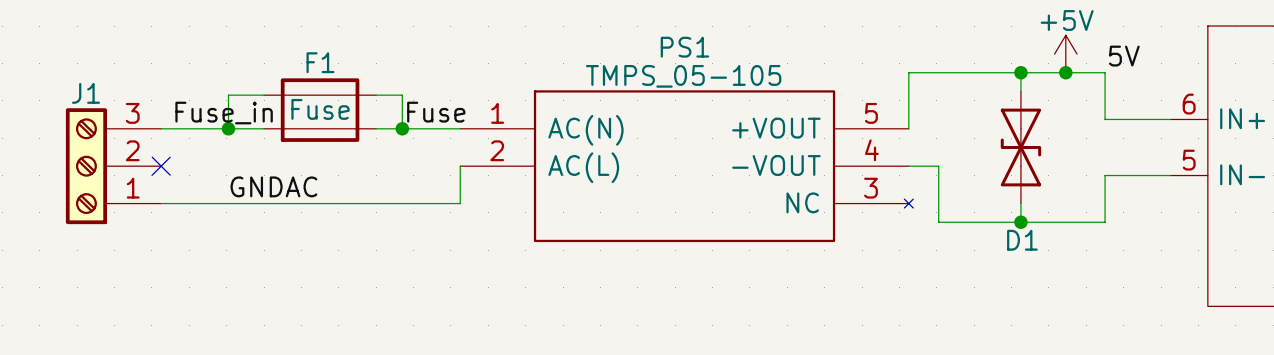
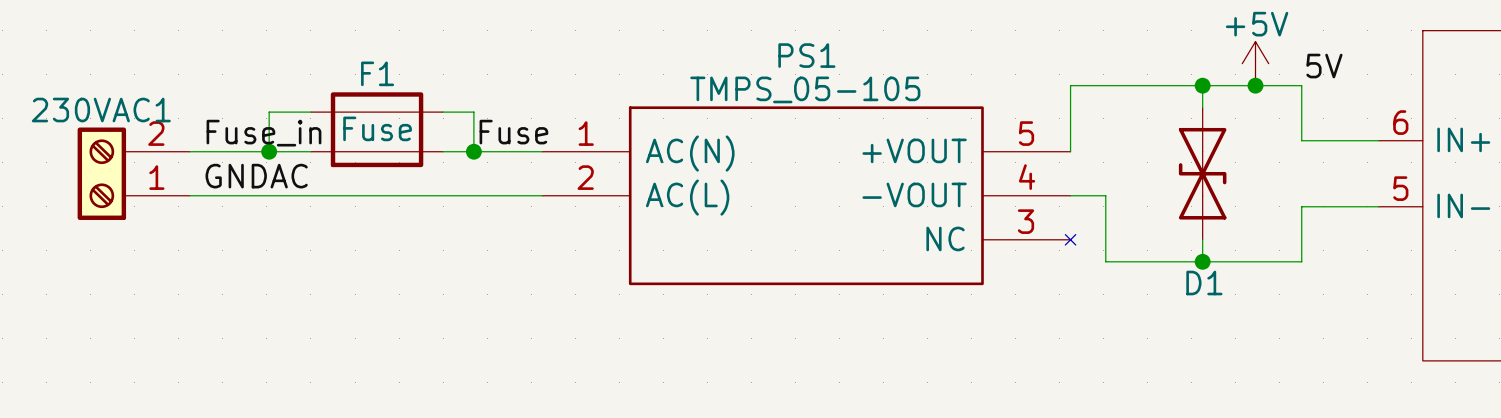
230VAC1: none -> (133, 173)
J1: (113, 166) -> none
no-connect mark: (161, 166) -> none
wire: (460, 166) (460, 203) (161, 203) -> (542, 195) (189, 195)
label position: GNDAC (273, 186) -> GNDAC (256, 176)

